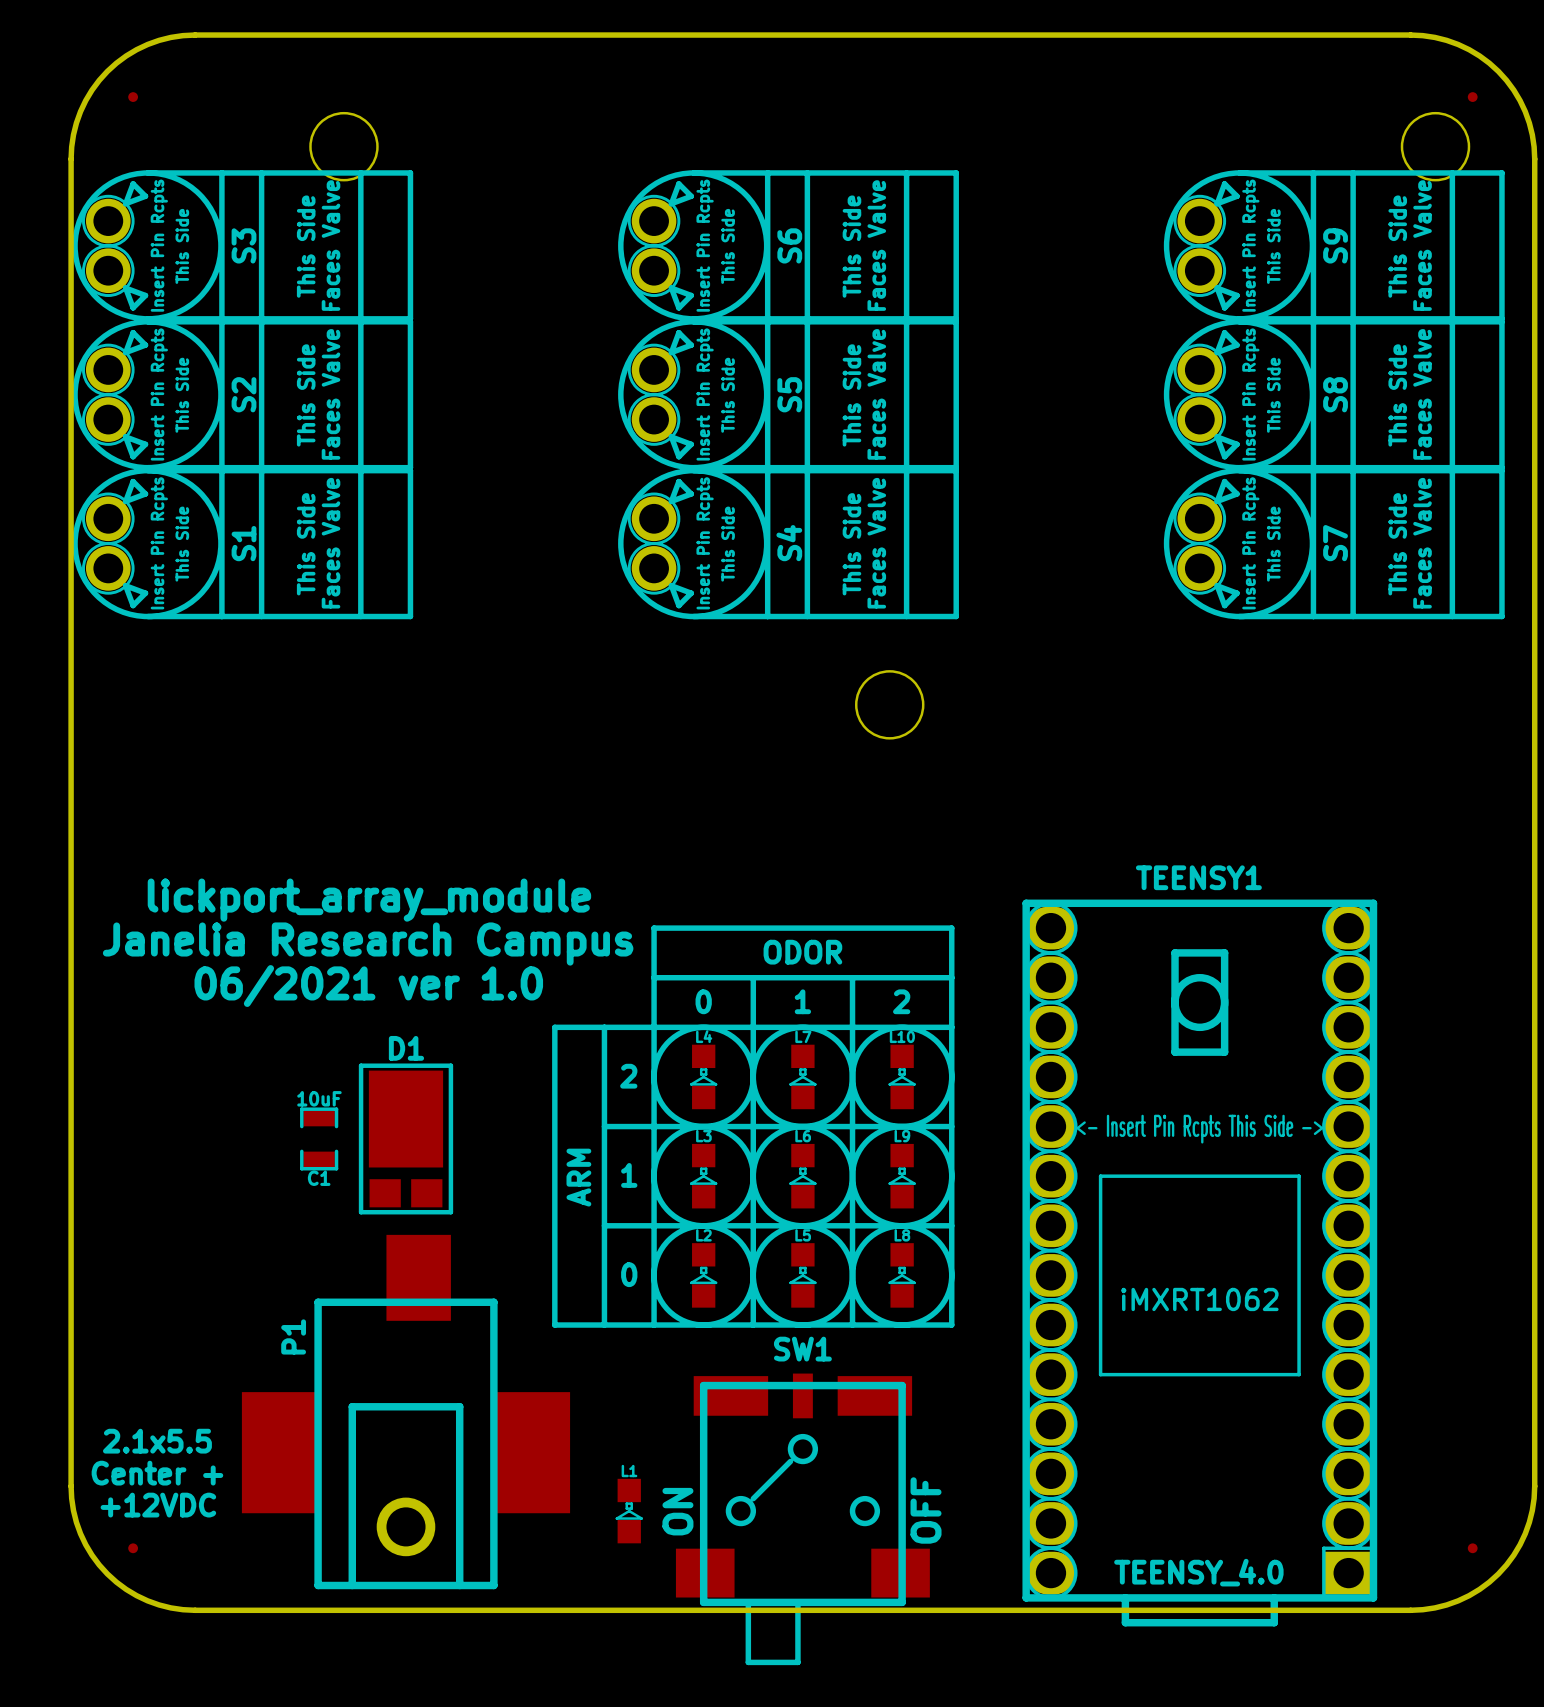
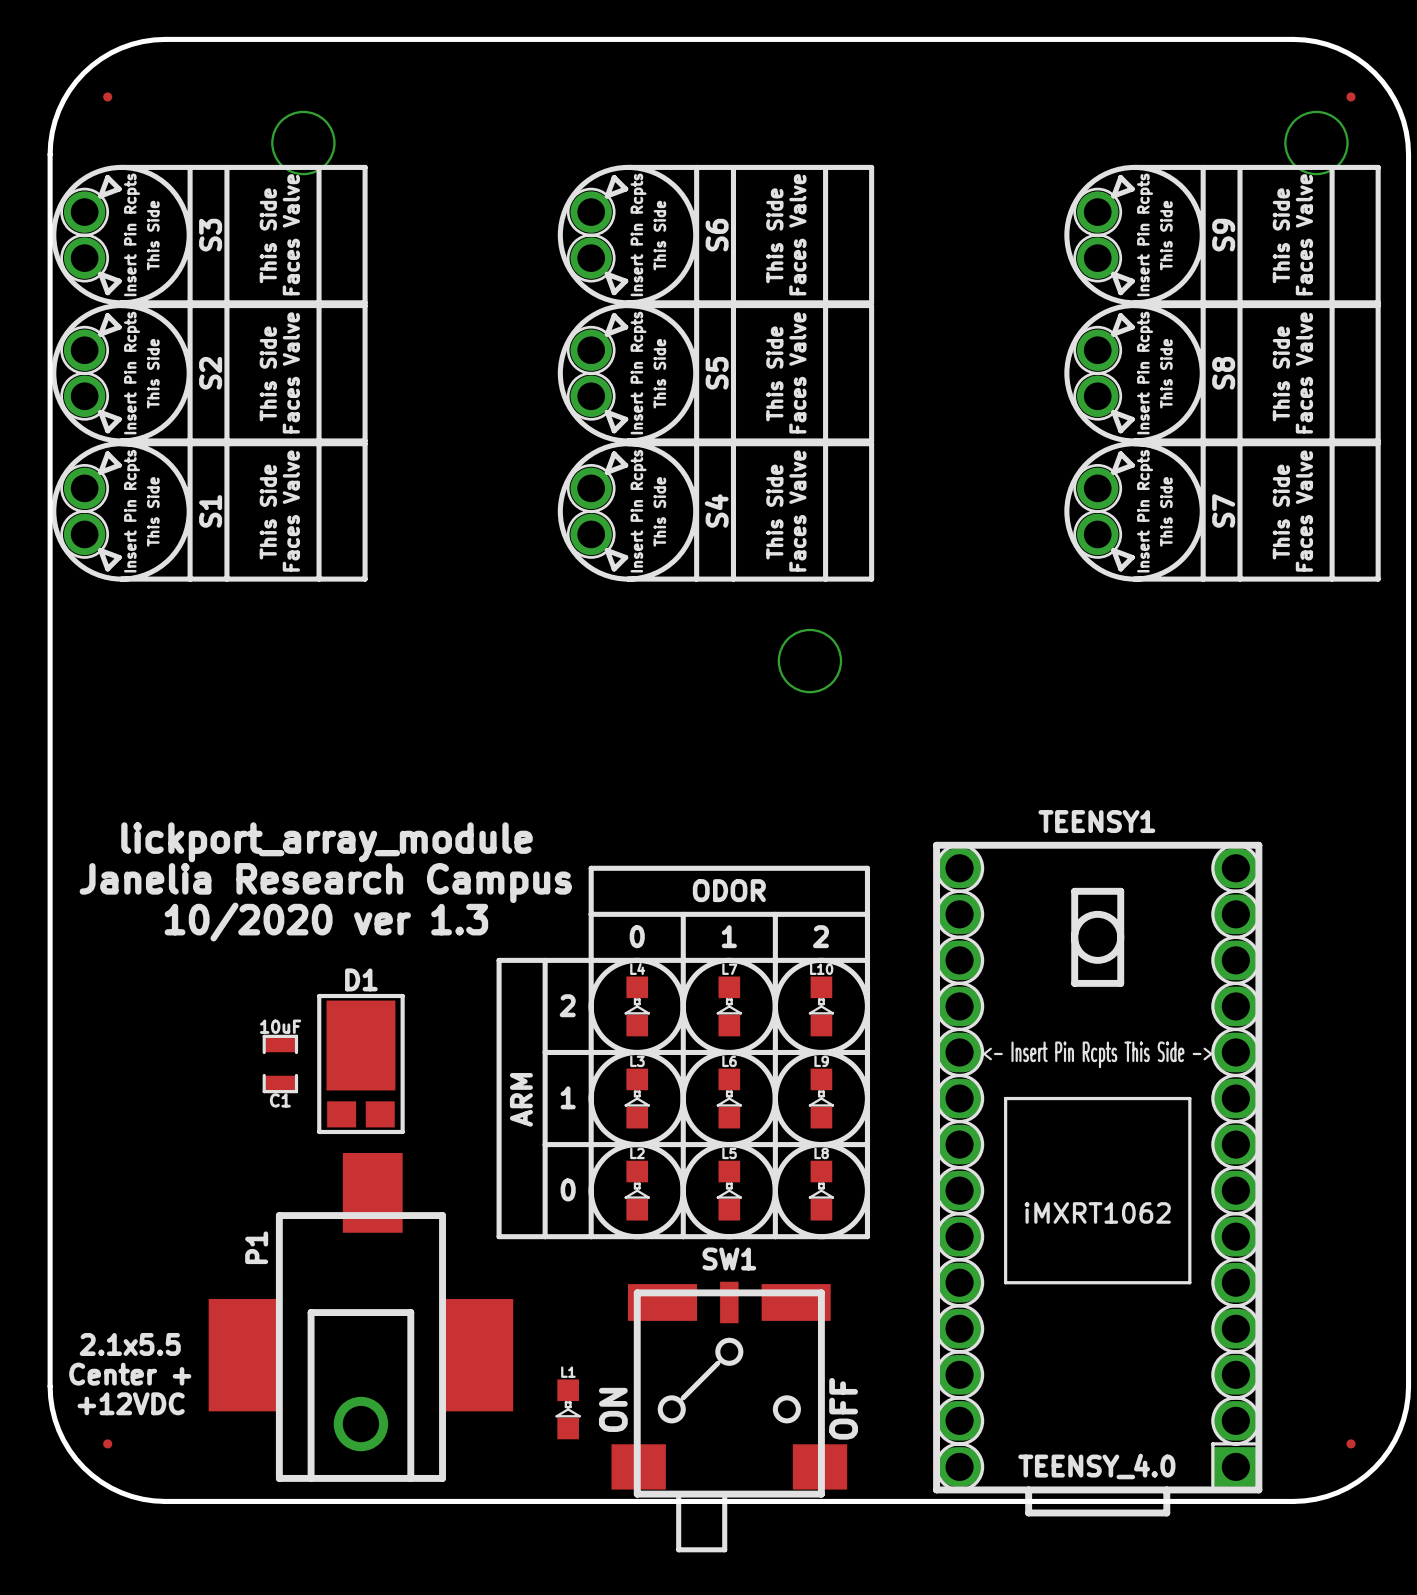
text: 06/2021 ver 1.0 (368, 986) -> 10/2020 ver 1.3 (326, 922)

